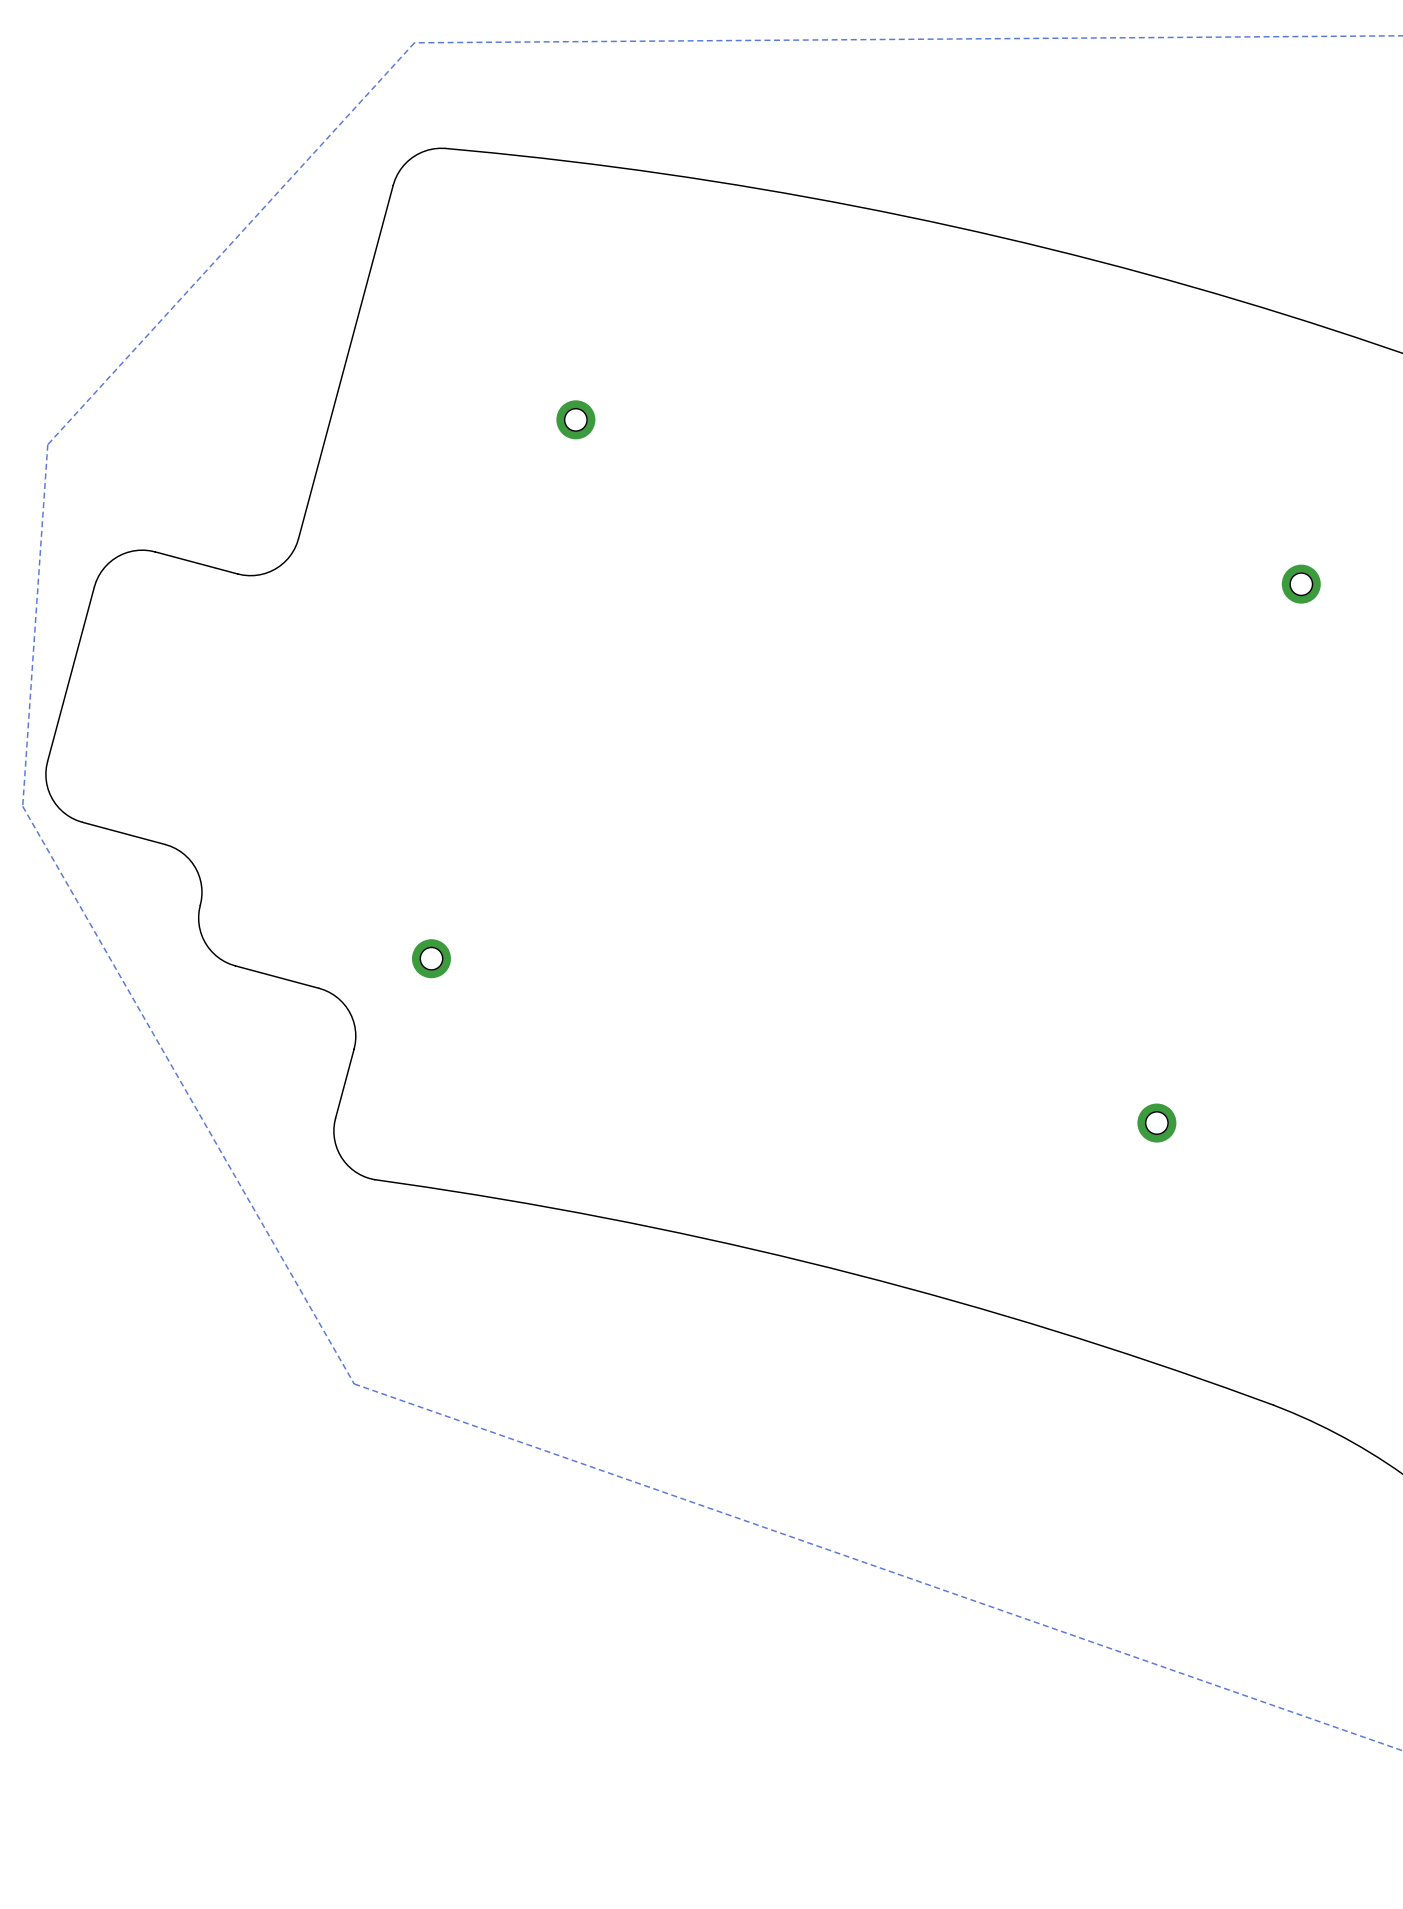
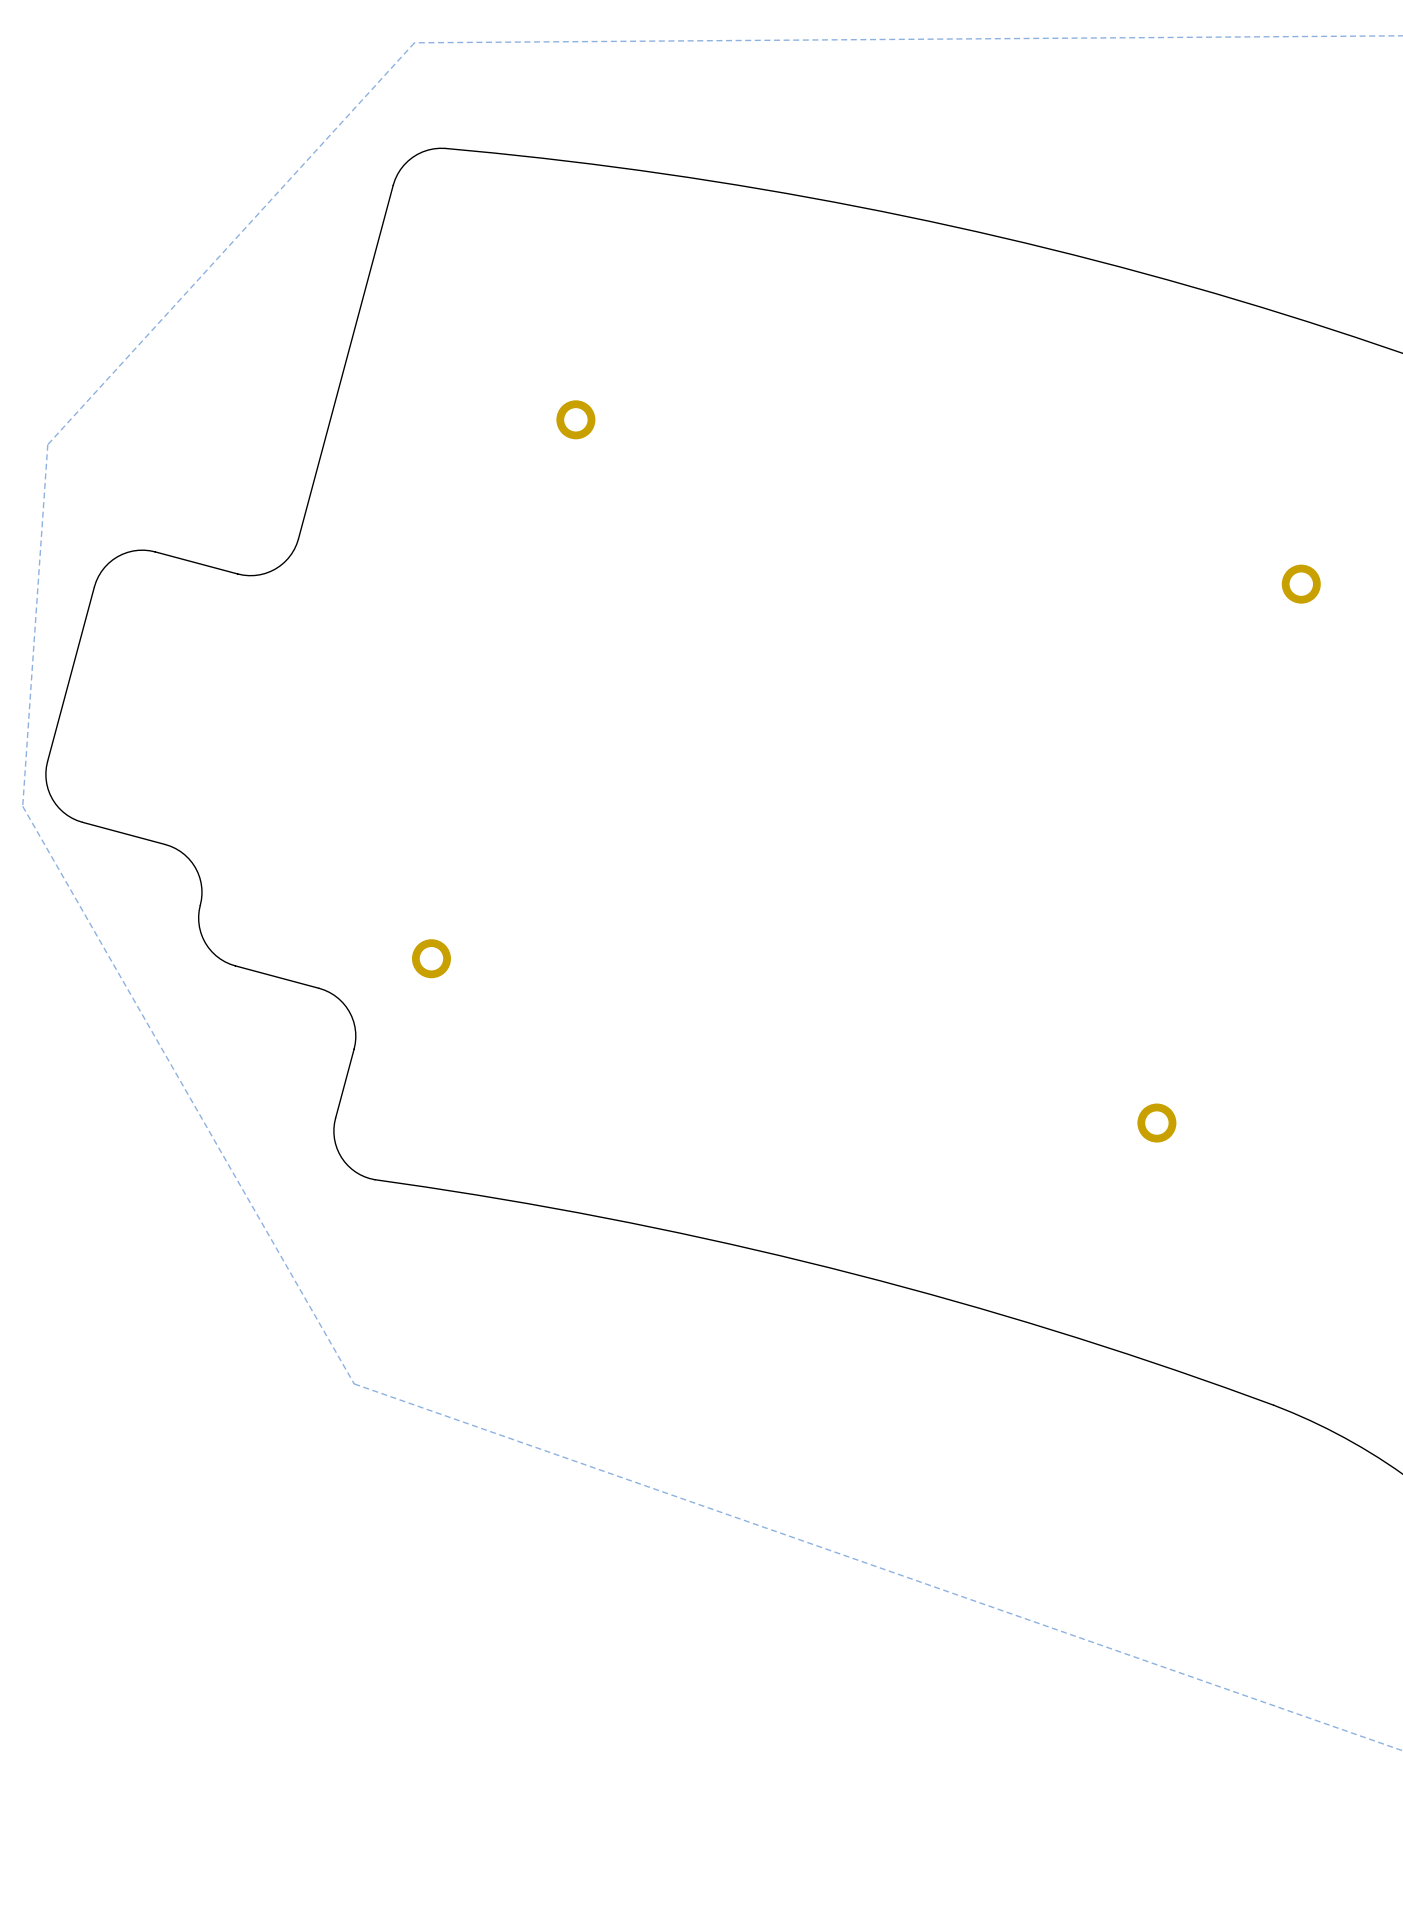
round board edge: [564, 408, 588, 432] -> none
round board edge: [1289, 572, 1314, 596] -> none
round board edge: [419, 946, 444, 971] -> none
round board edge: [1145, 1111, 1169, 1135] -> none

